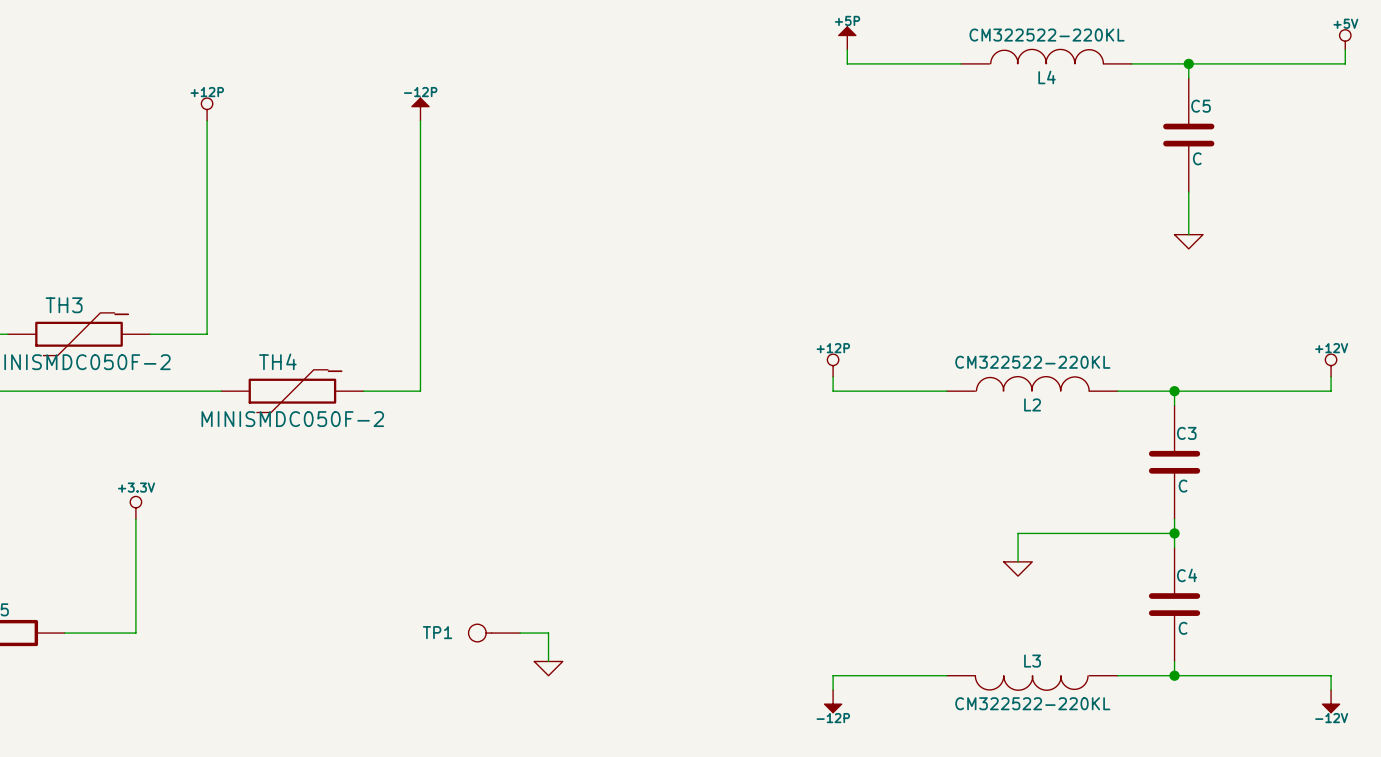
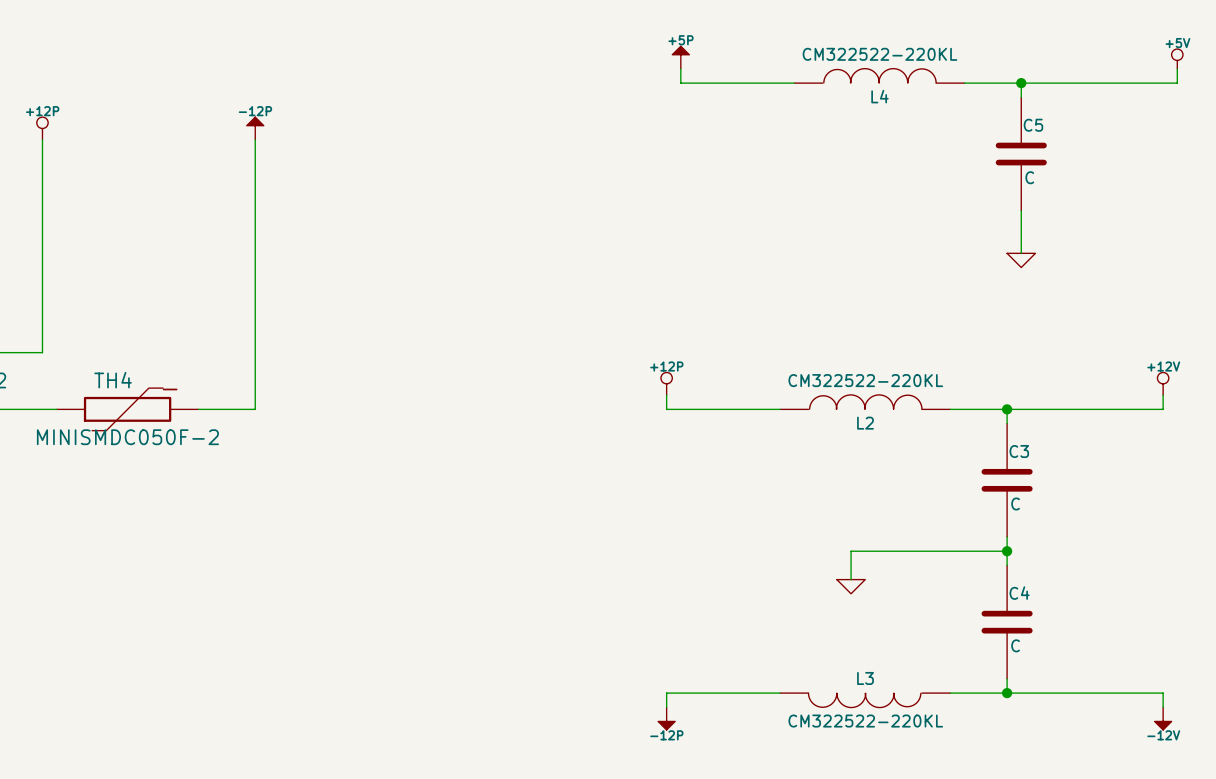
TP1: (494, 633) -> none
wire: (520, 633) (548, 633) (548, 661) -> none
power symbol: (548, 668) -> none

